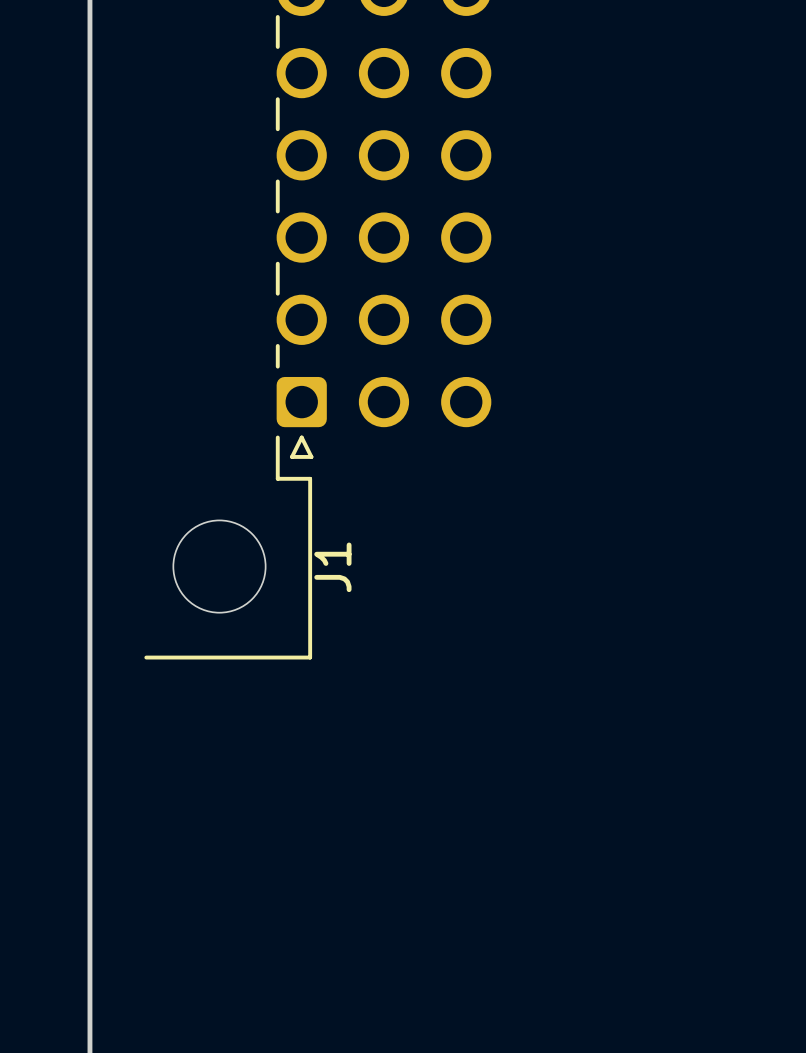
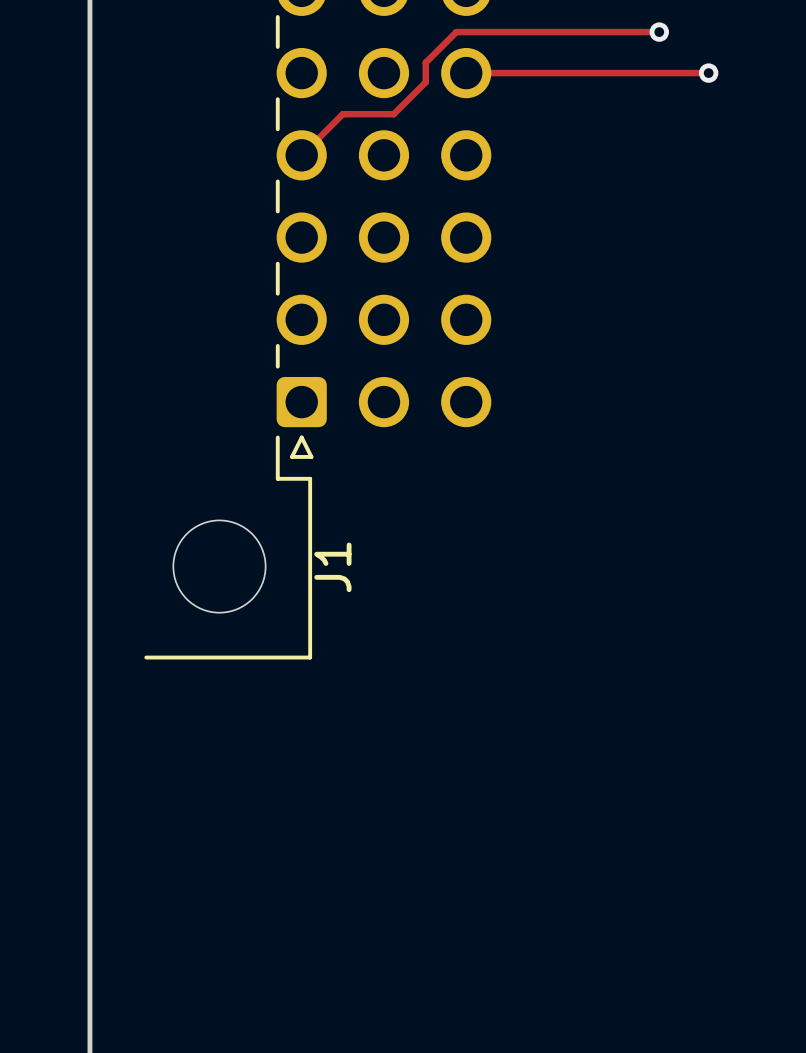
track: none -> (659, 32) (456, 32) (425, 62) (425, 82) (393, 114) (342, 114) (301, 155)
via: none -> (659, 32)
track: none -> (466, 73) (708, 73)
via: none -> (708, 73)

